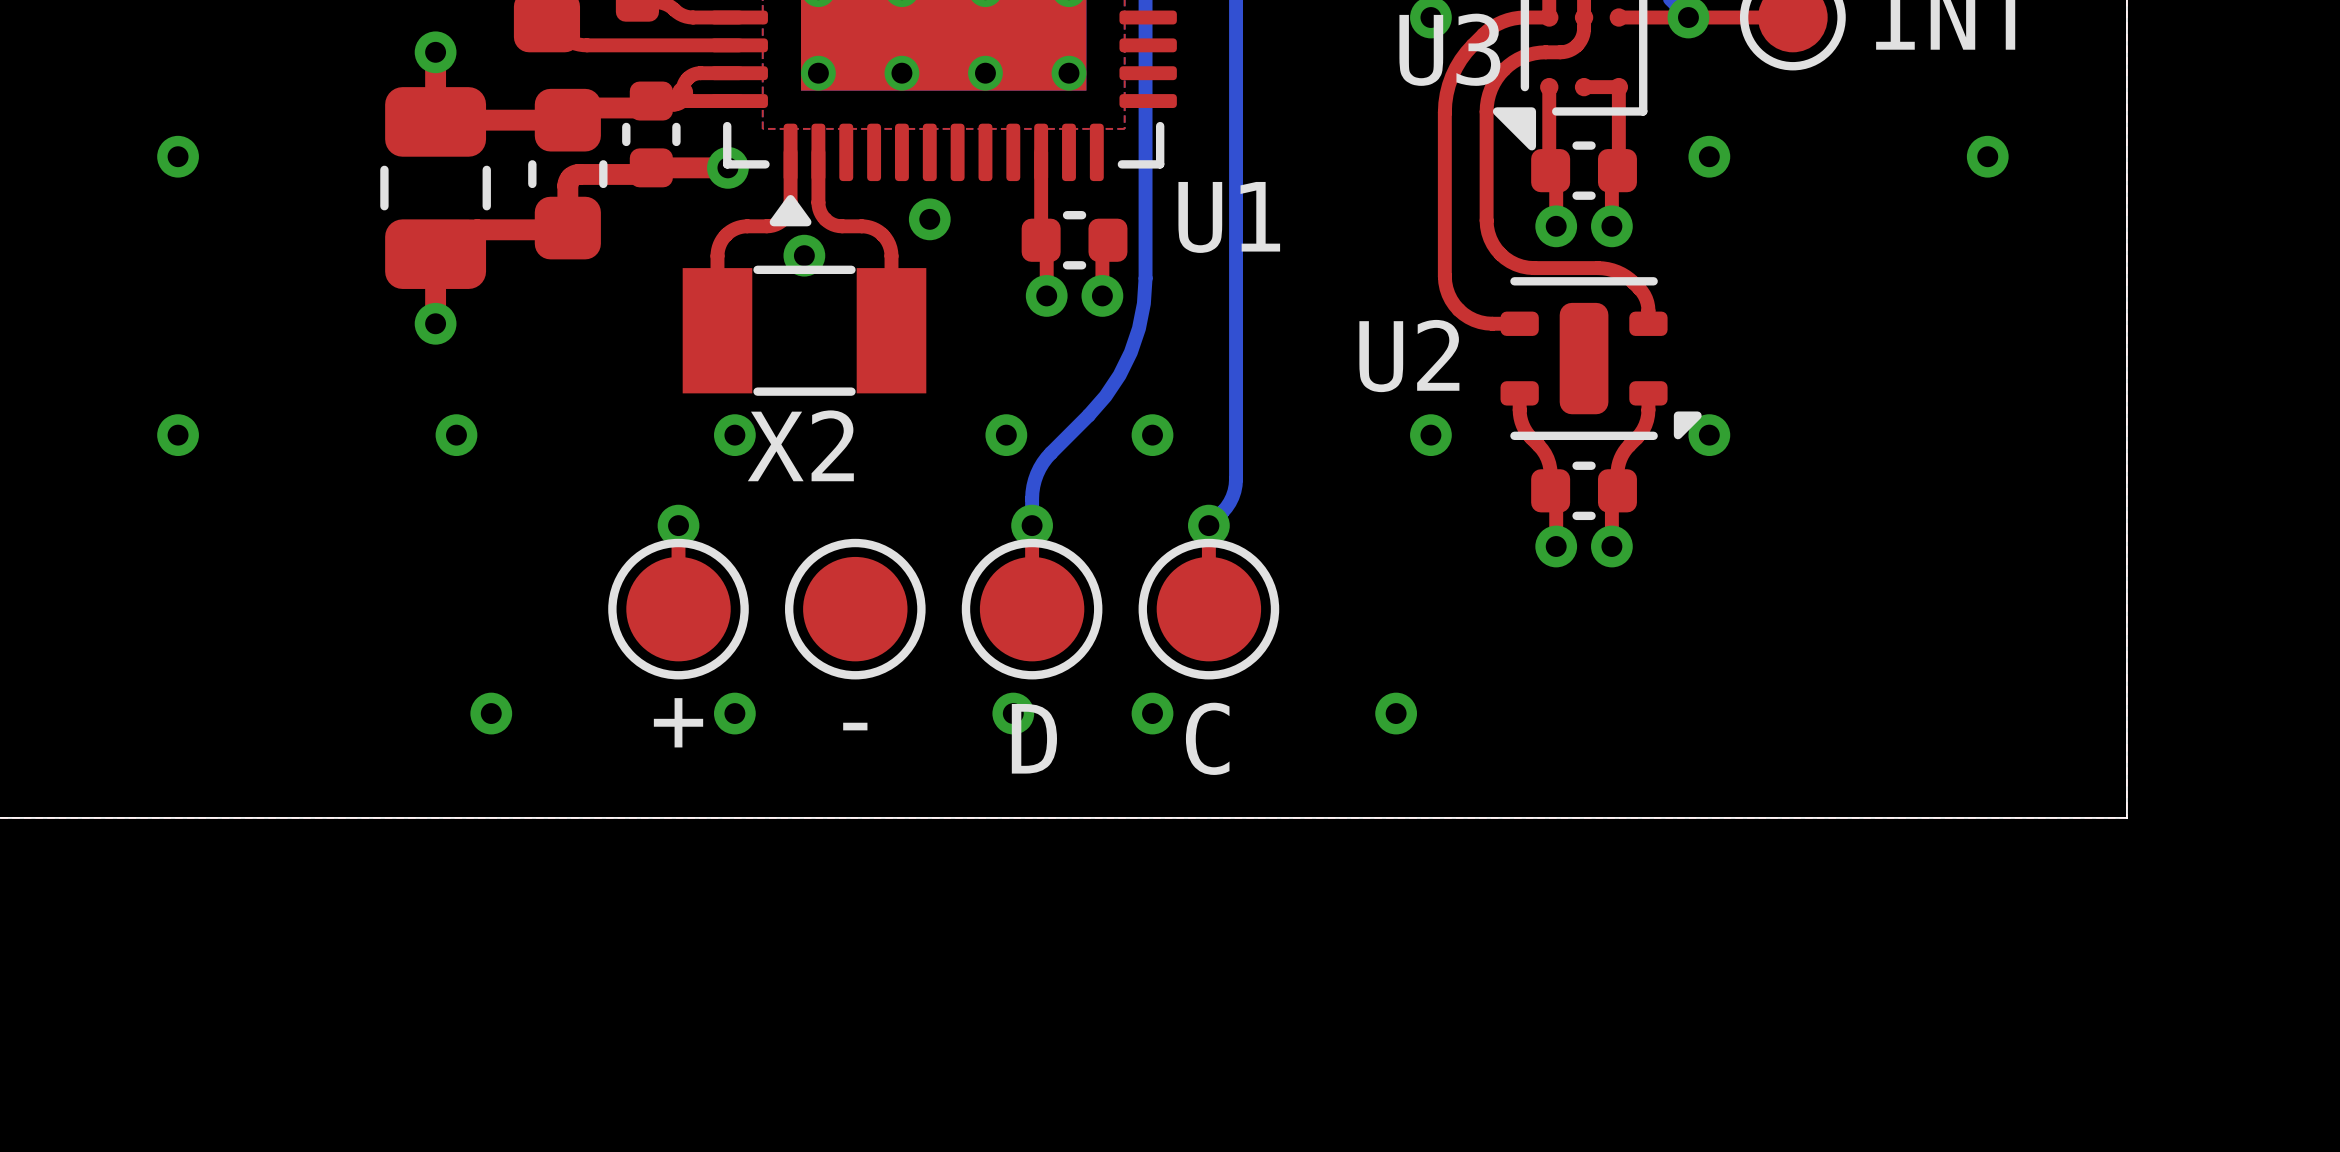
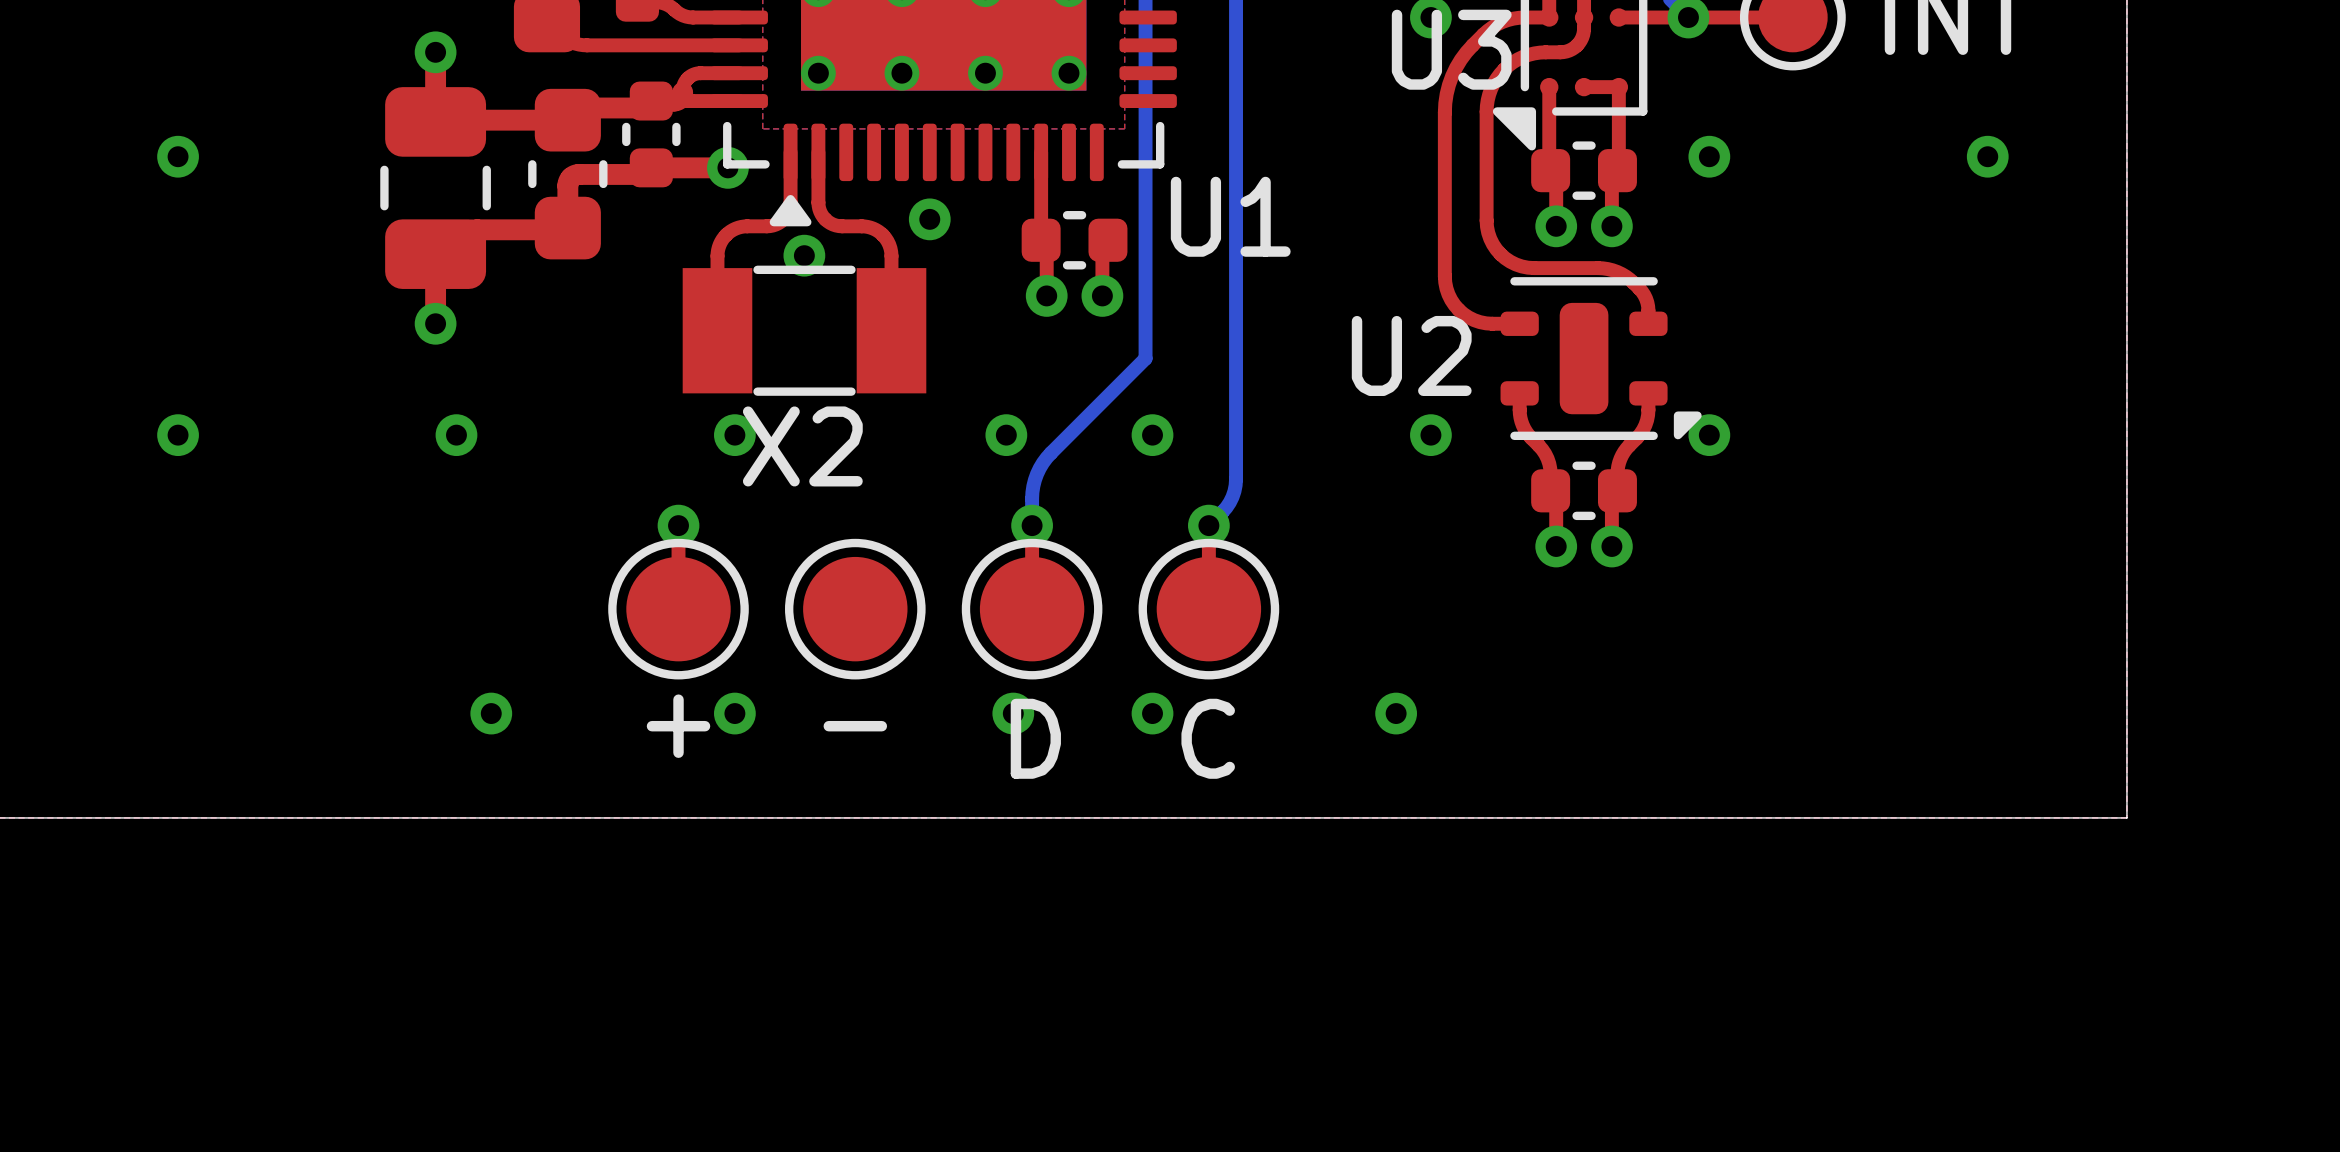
bottom track: (1145, 278) (1143, 303) (1138, 328) (1130, 352) (1119, 375) (1105, 396) (1088, 415) -> (1145, 278) (1145, 358) (1088, 415)

